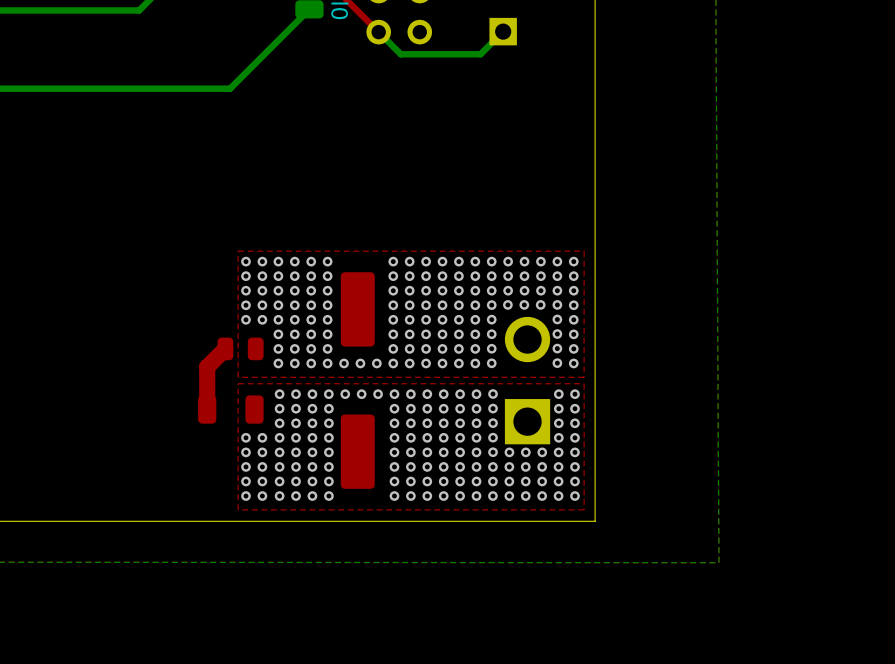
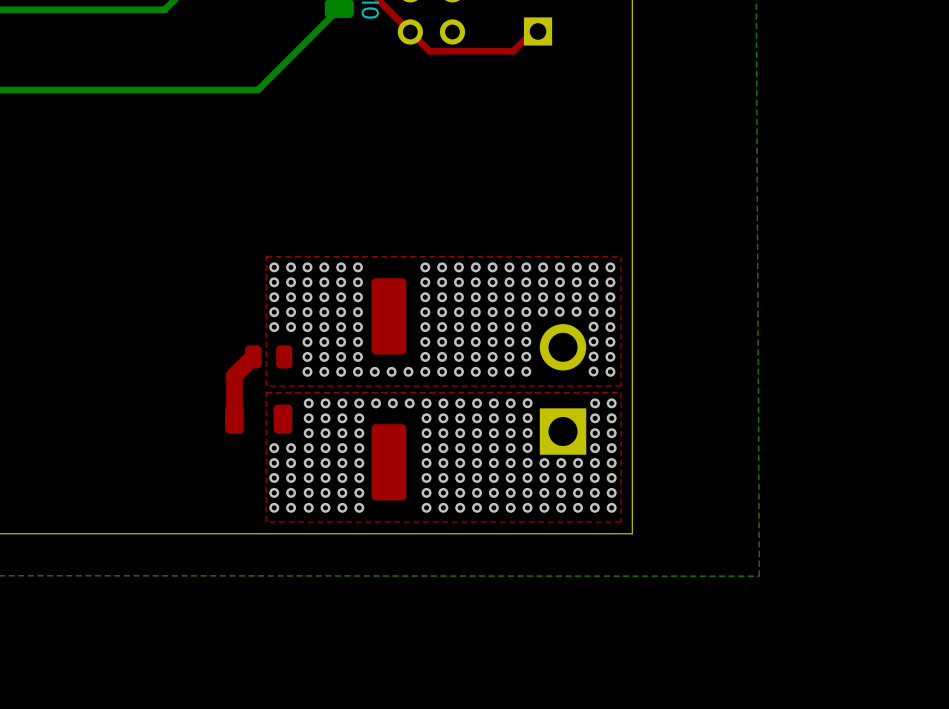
top track: none -> (538, 26) (513, 51) (429, 51) (410, 31)
bottom track: (503, 31) (480, 54) (400, 54) (378, 32) -> none

